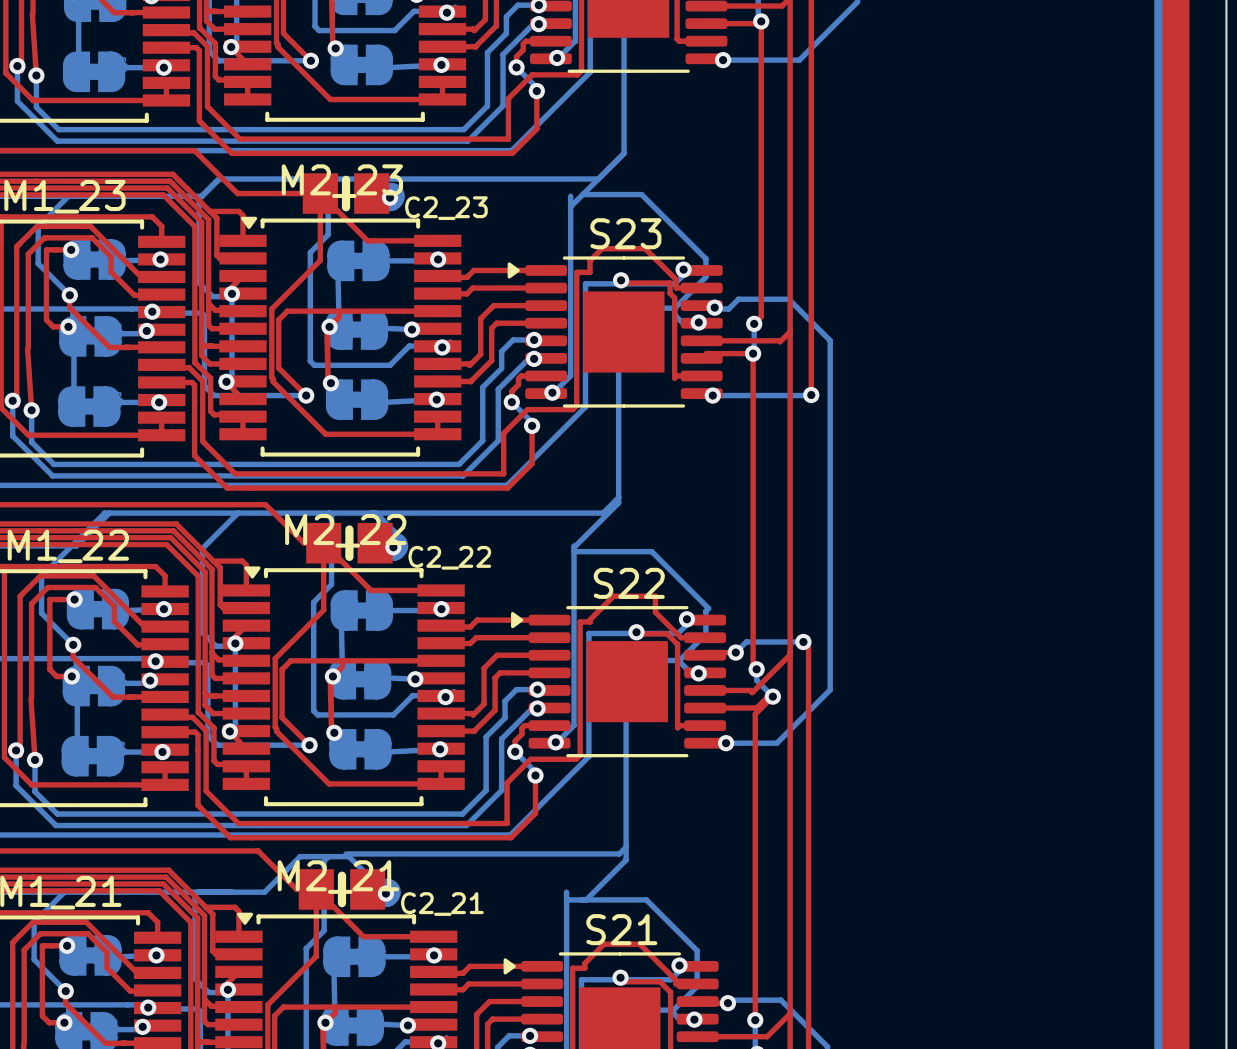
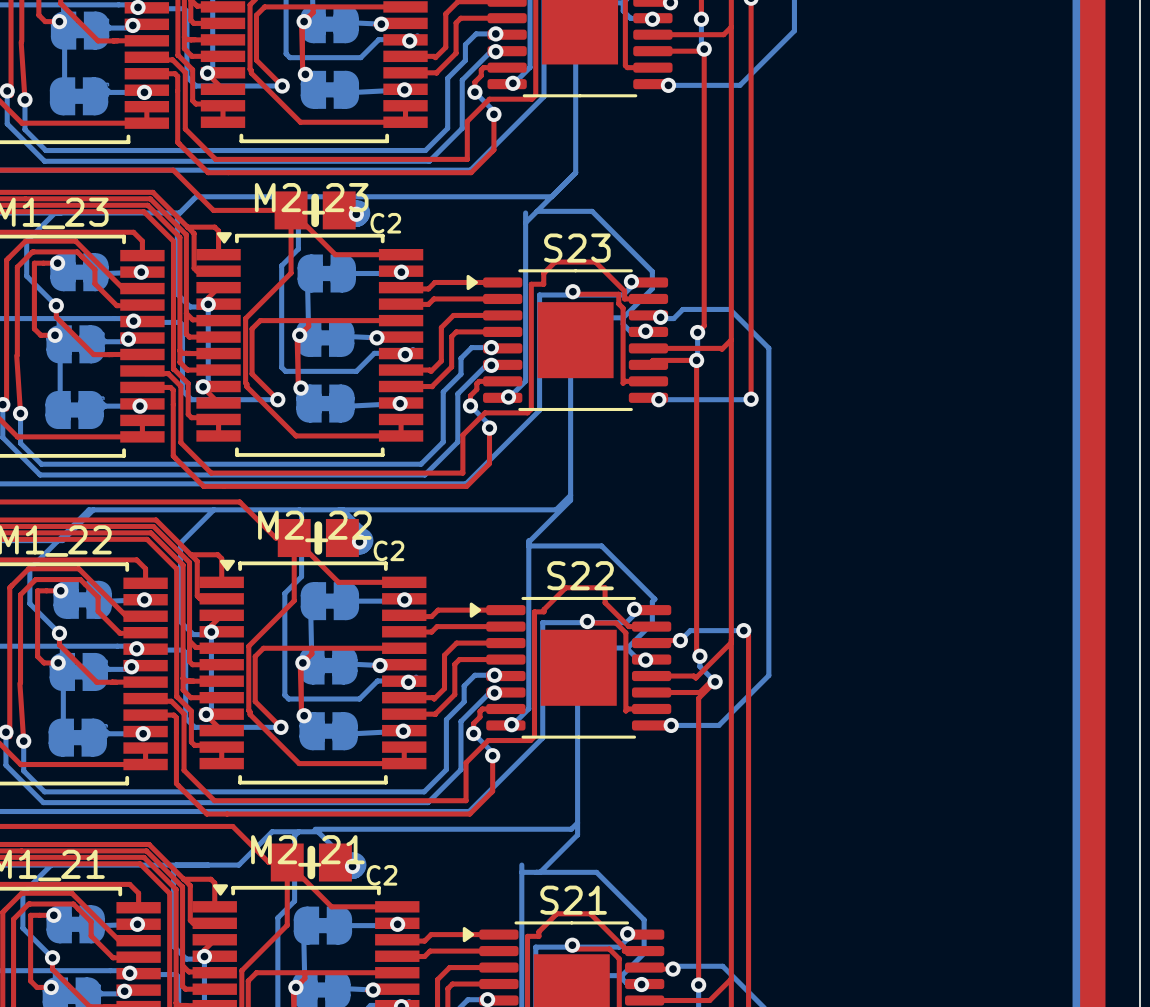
C2_23 name: C2_23 (446, 208) -> C2 (385, 223)
C2_22 name: C2_22 (449, 557) -> C2 (388, 550)
C2_21 name: C2_21 (442, 904) -> C2 (382, 875)

